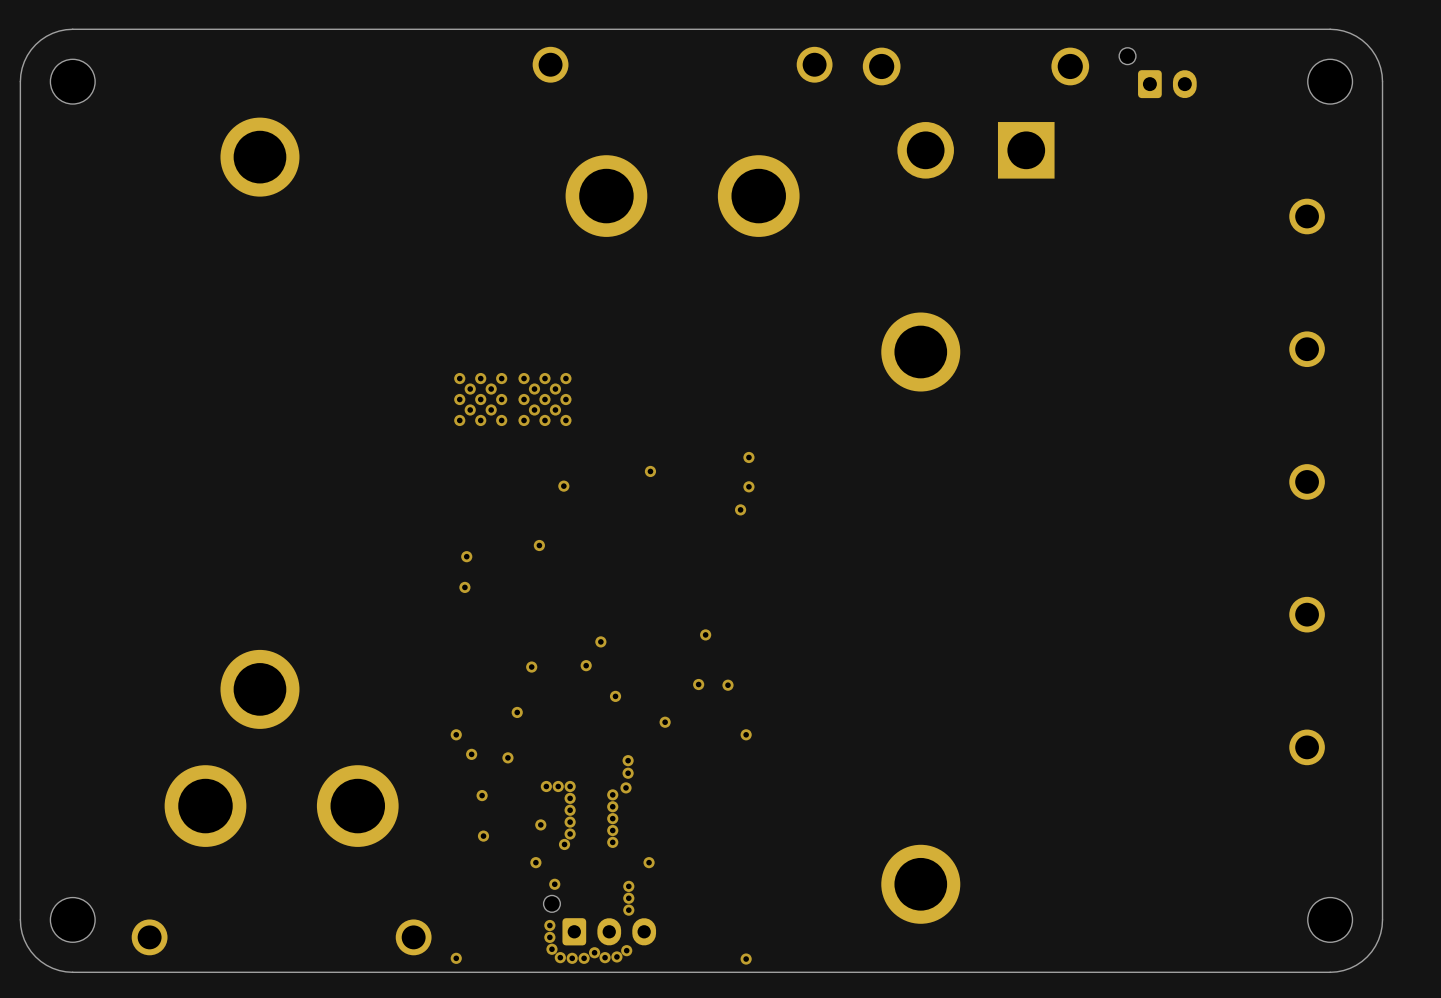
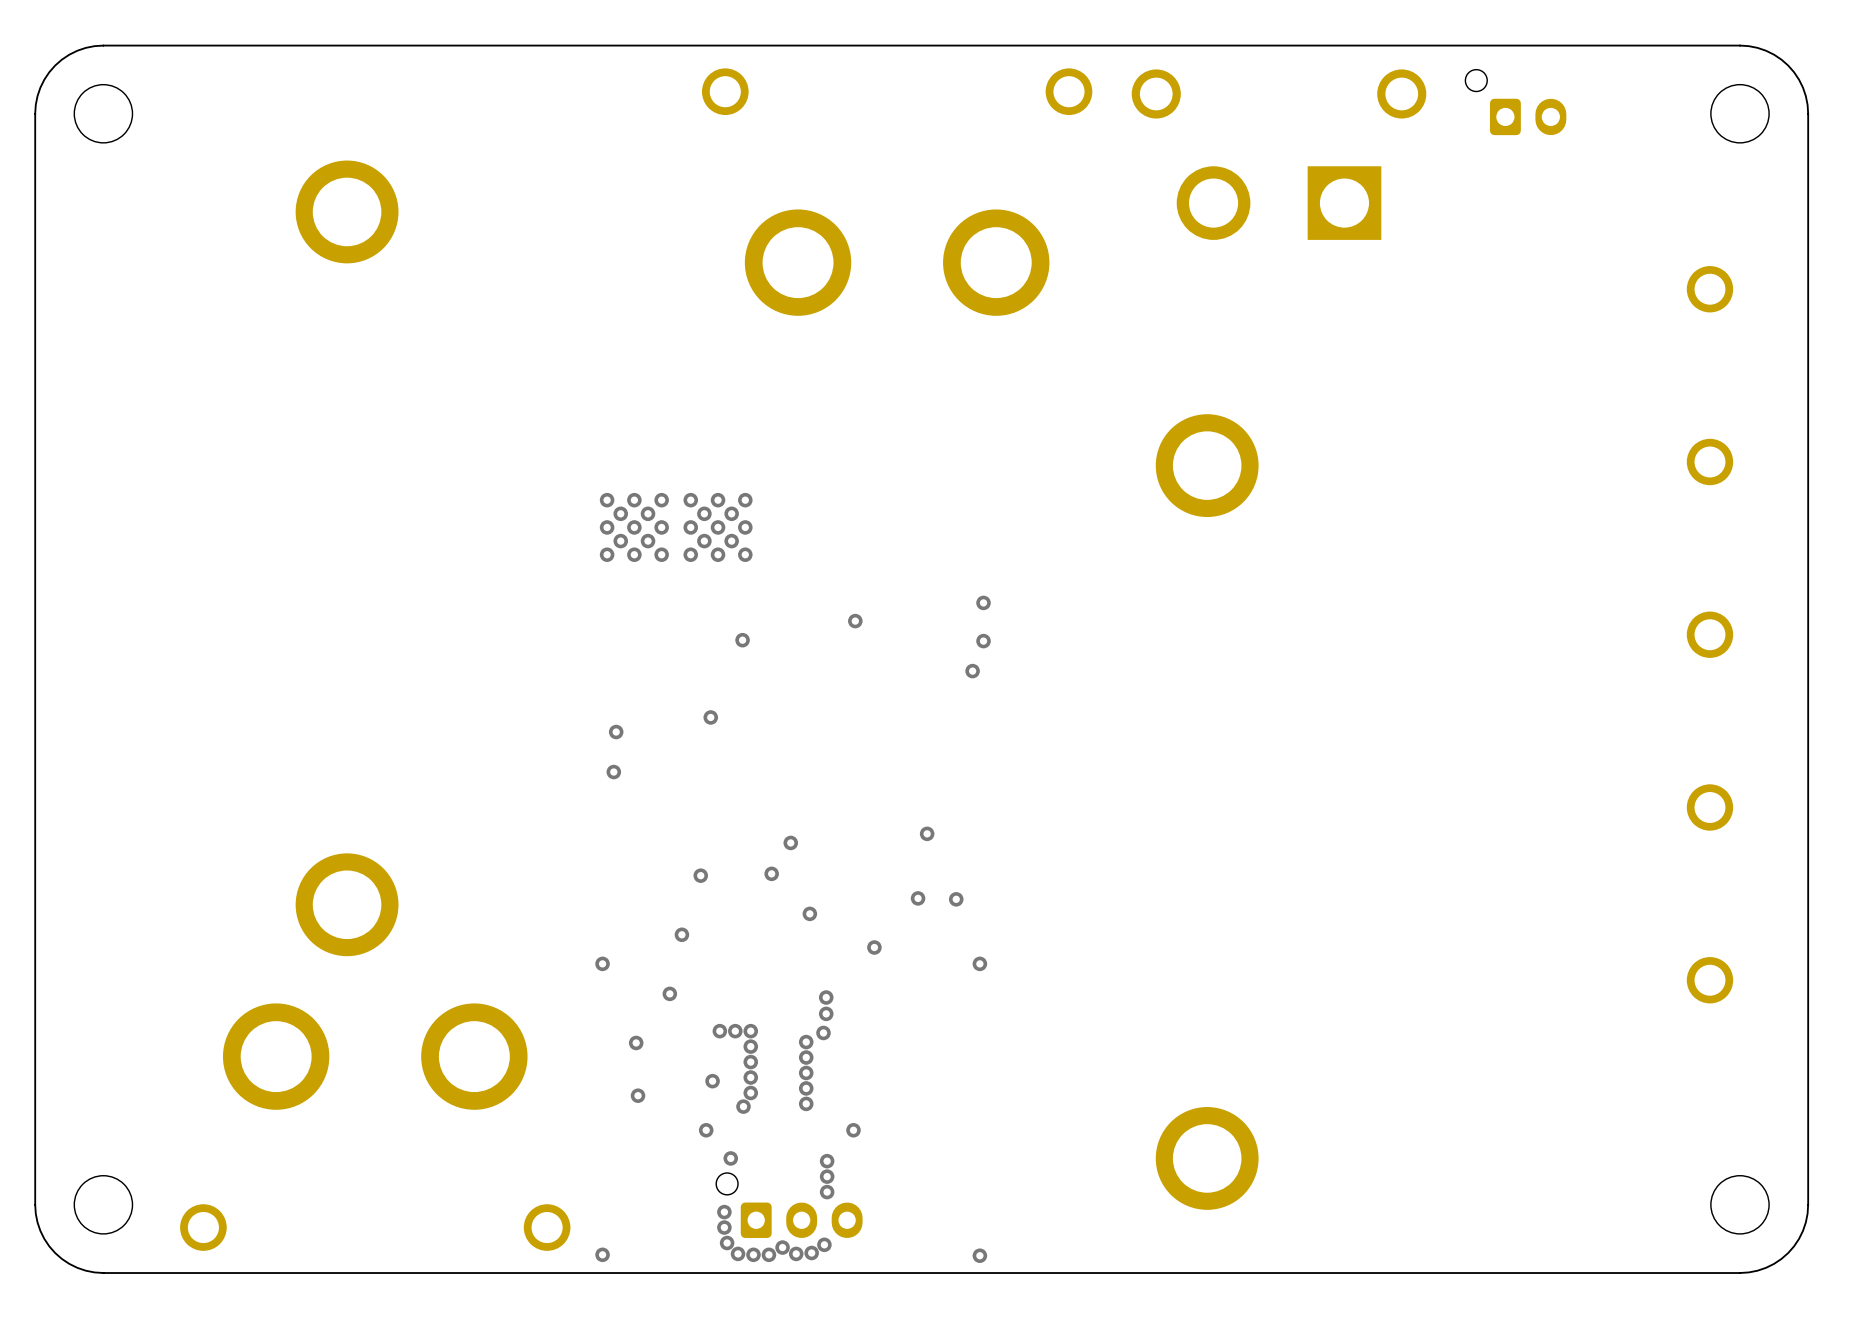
via: (471, 754) -> none

